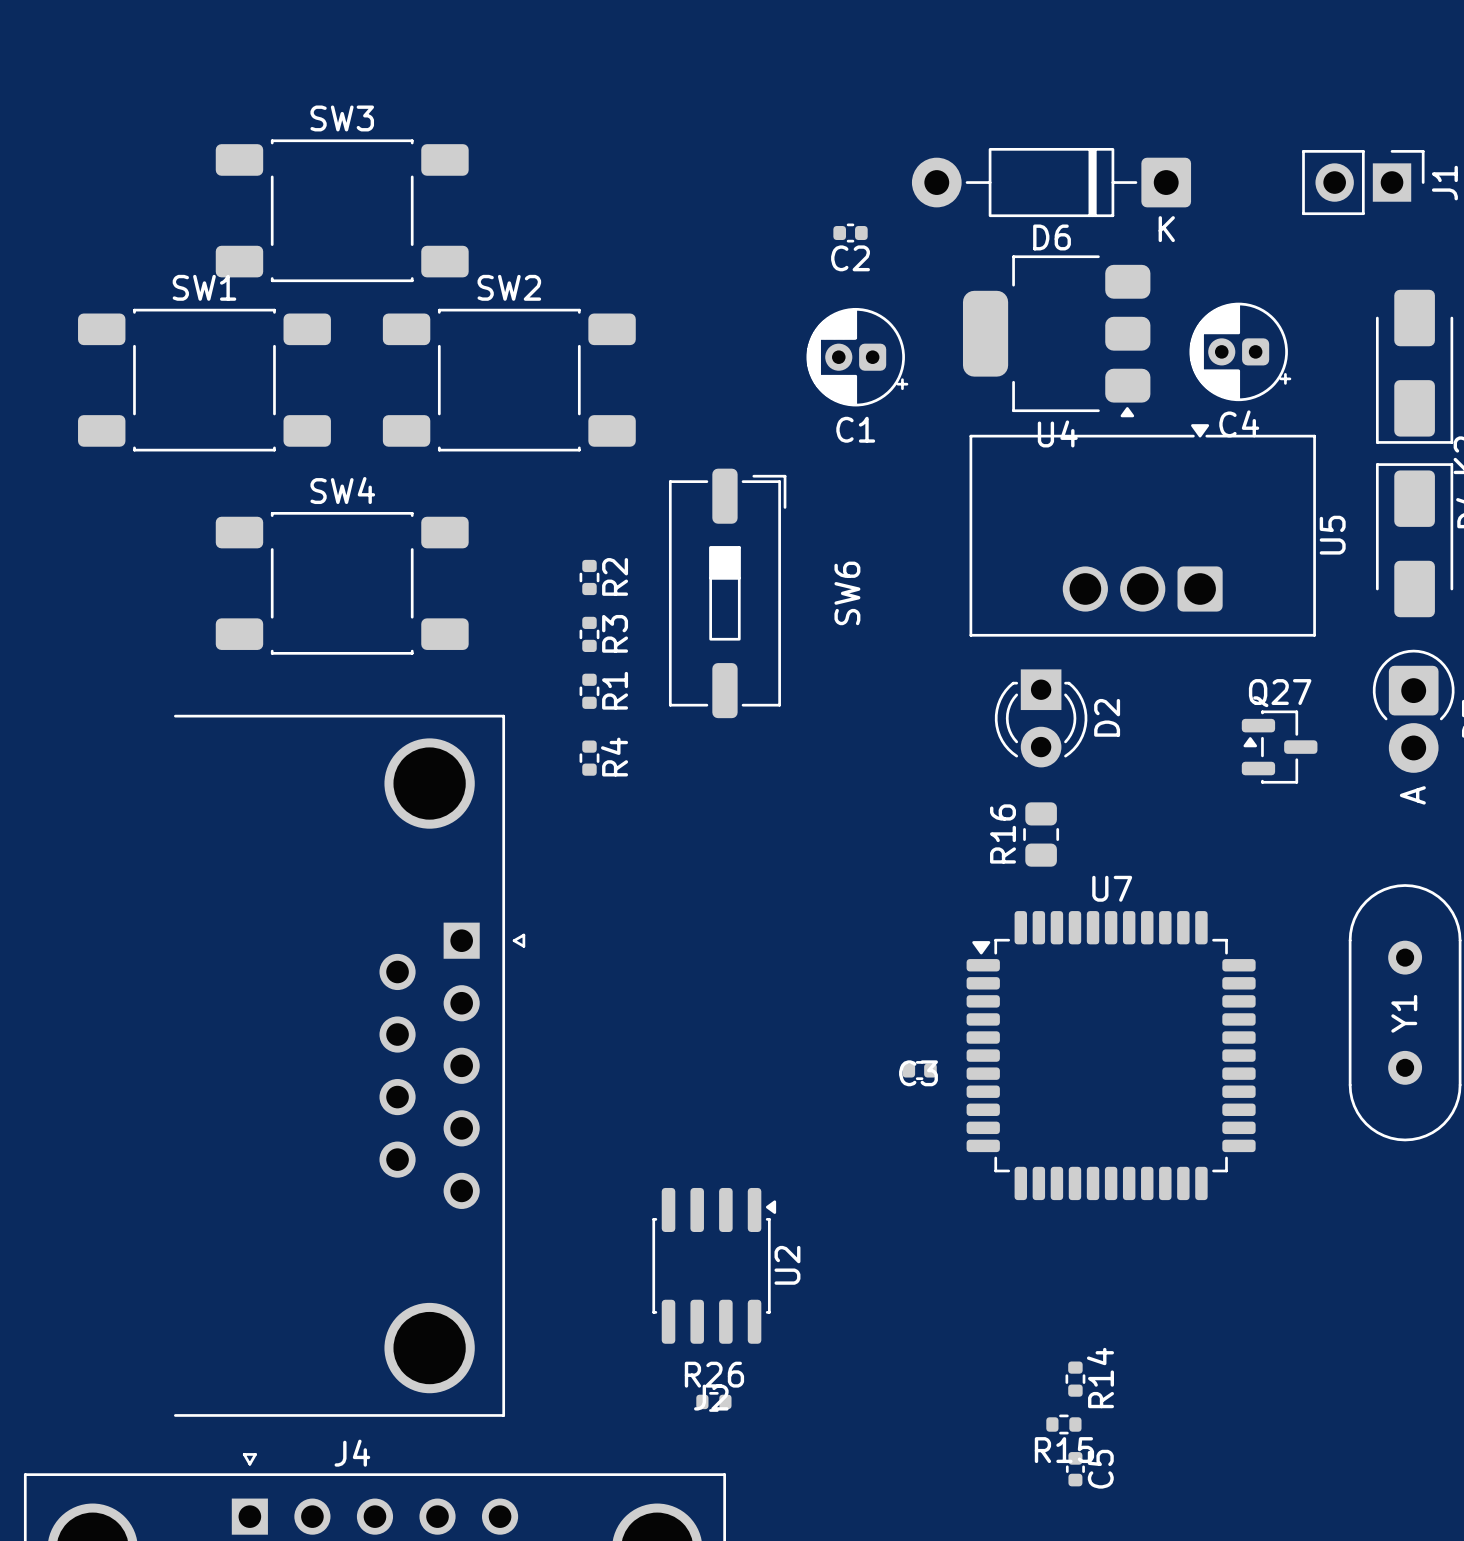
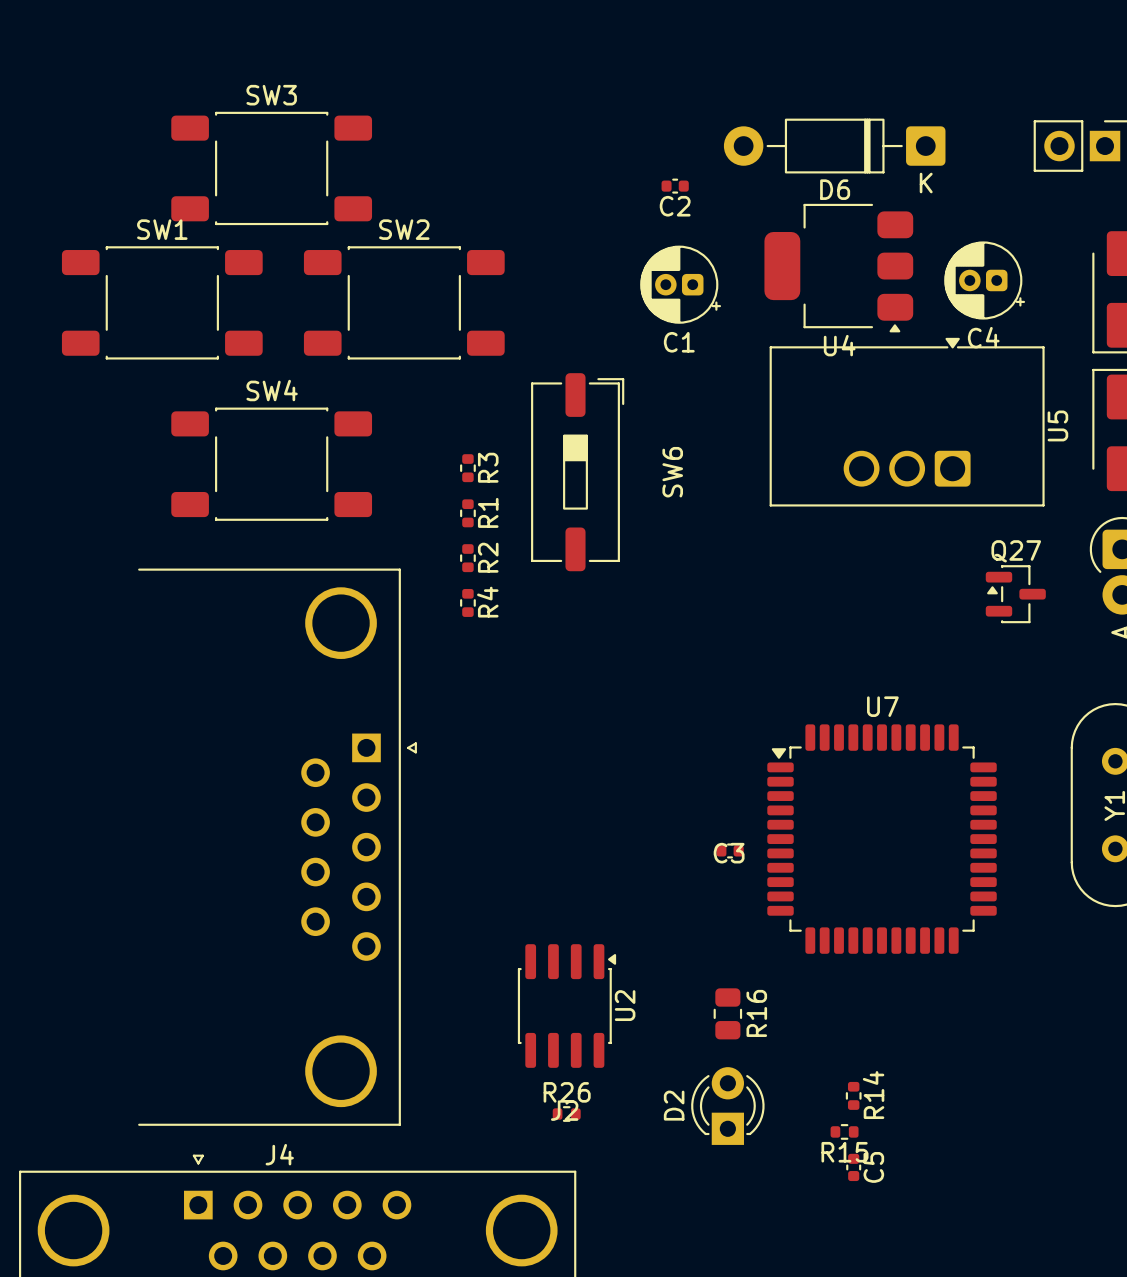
R2 position: (589, 577) -> (467, 558)
R3 position: (589, 634) -> (467, 468)
R1 position: (589, 691) -> (467, 513)
D2 rotation: 0° (1041, 718) -> 180° (727, 1106)
D2 position: (1041, 718) -> (727, 1106)
R16 name position: R16 (1003, 833) -> R16 (756, 1013)
R16 position: (1041, 834) -> (727, 1013)

